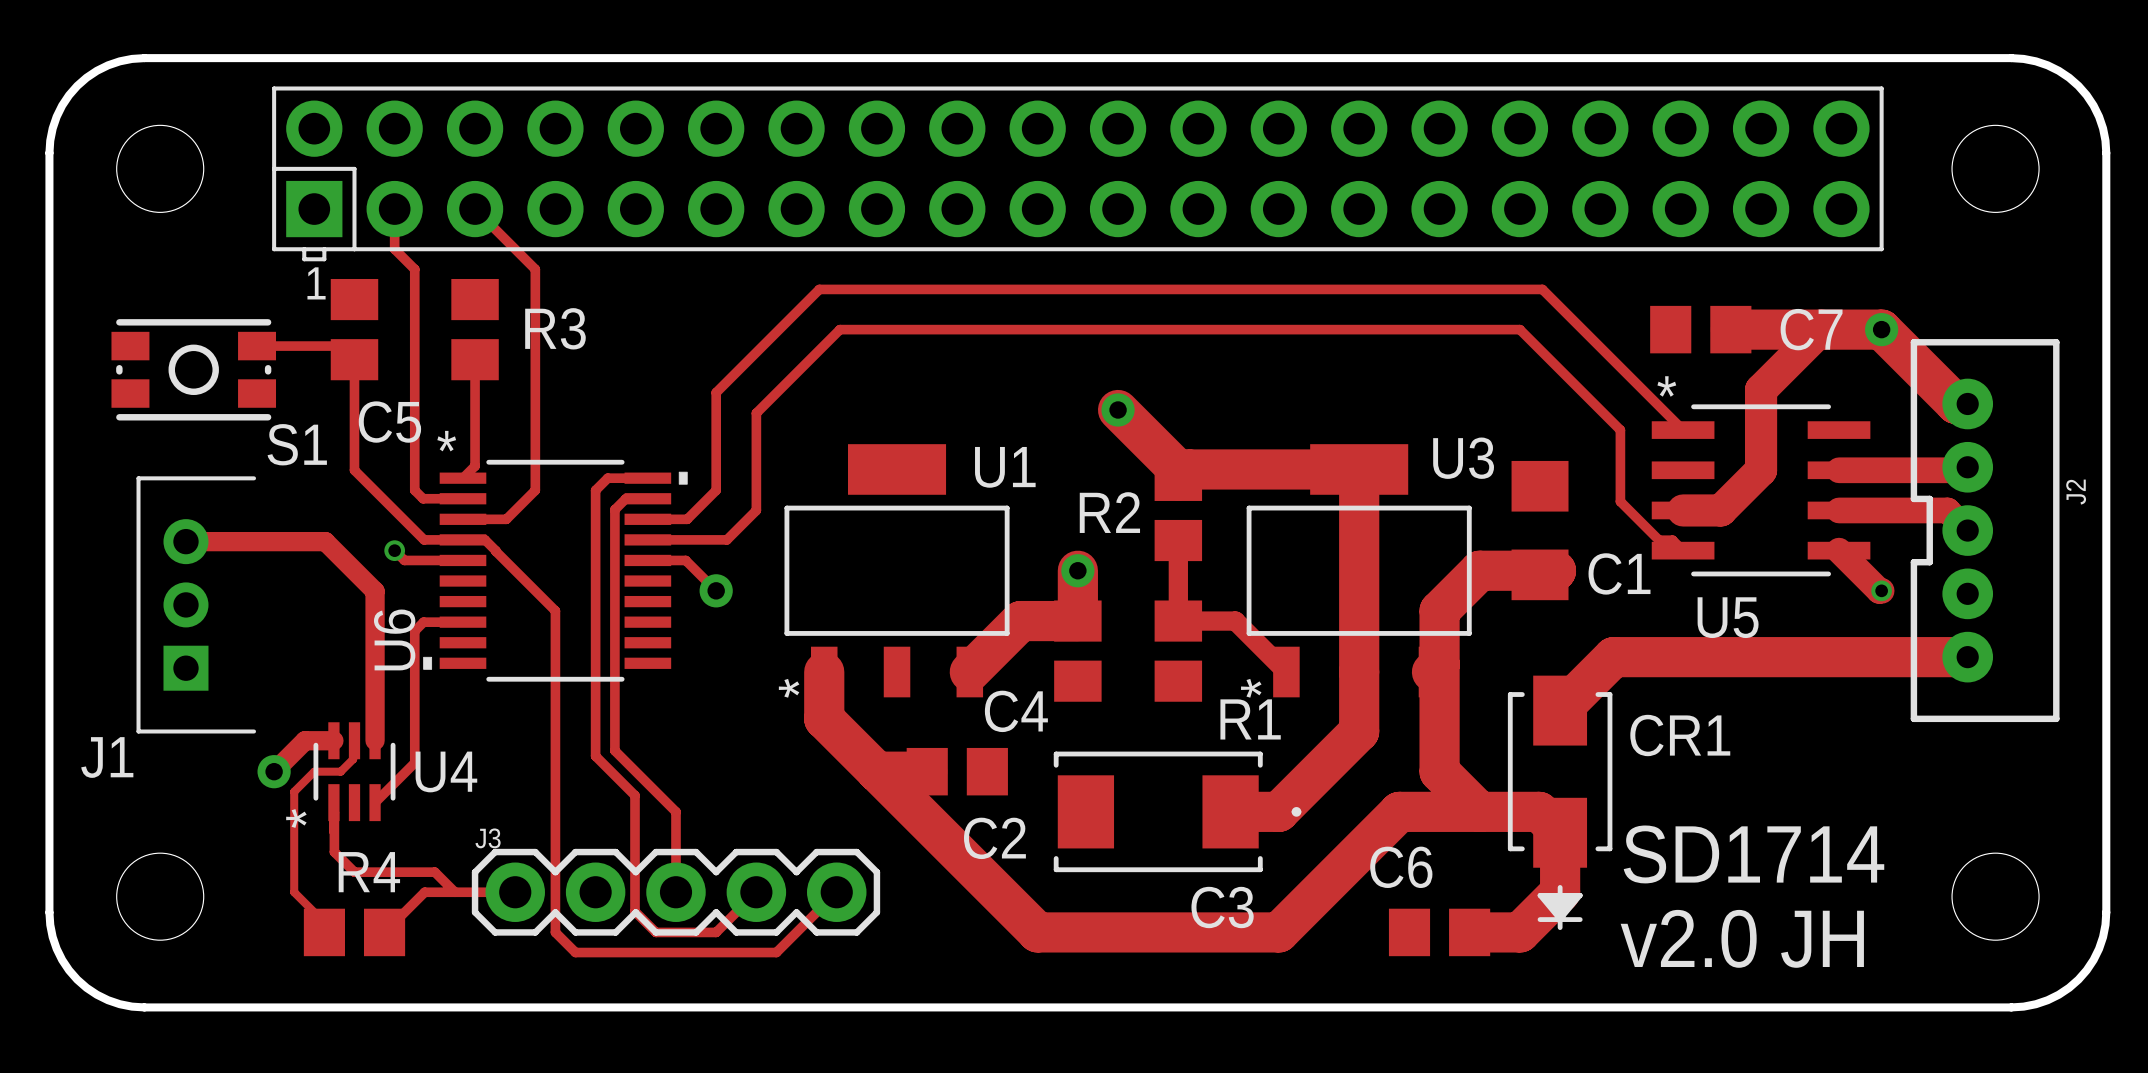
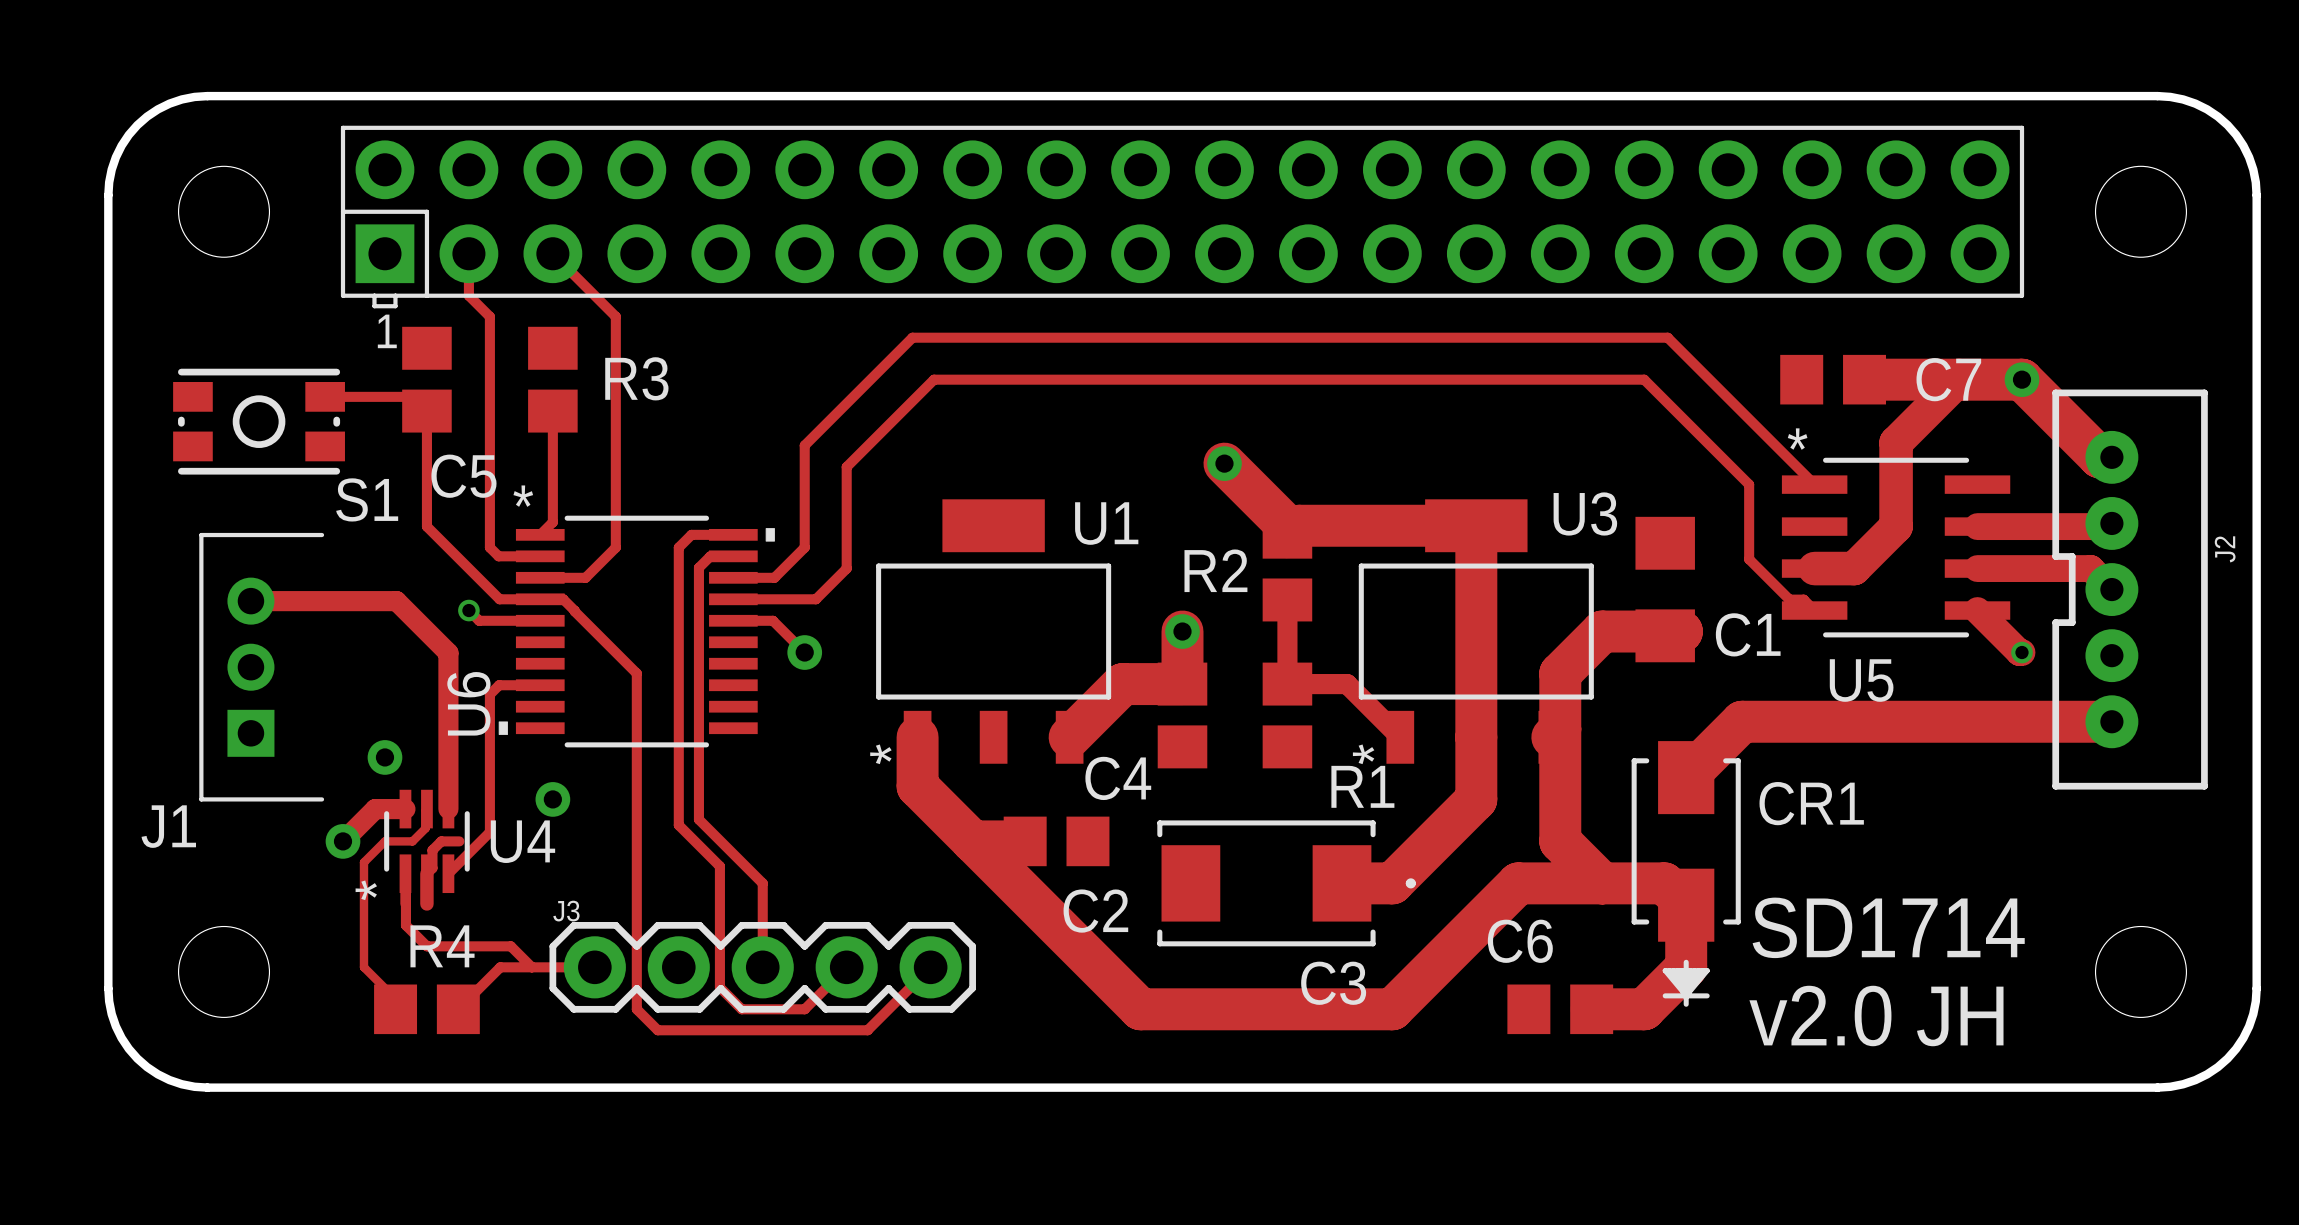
via: none -> (384, 757)
via: none -> (552, 799)
track: none -> (459, 841) (441, 841) (432, 850) (432, 868) (426, 873) (426, 903)

